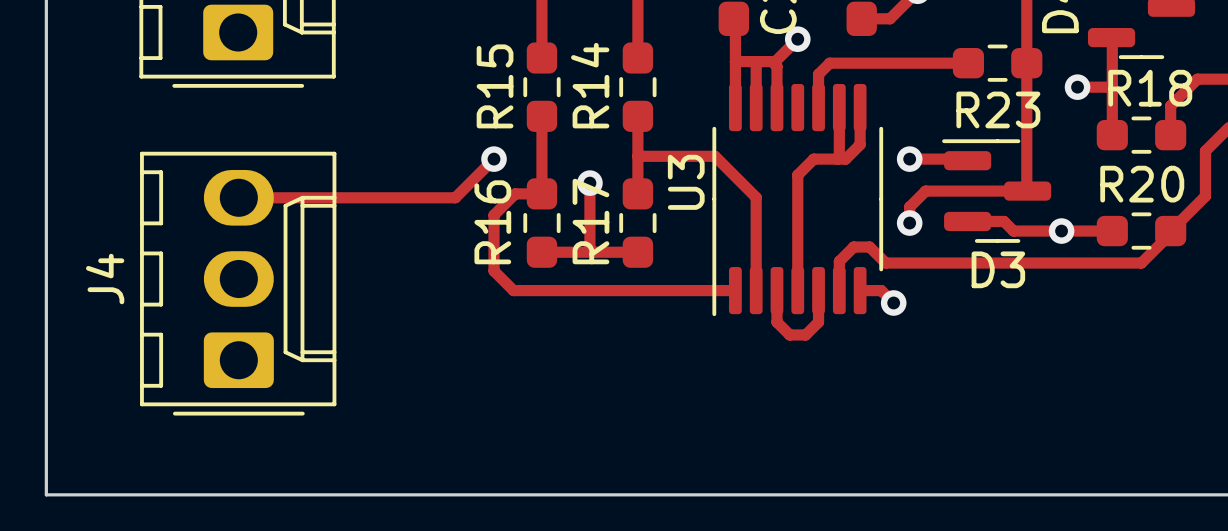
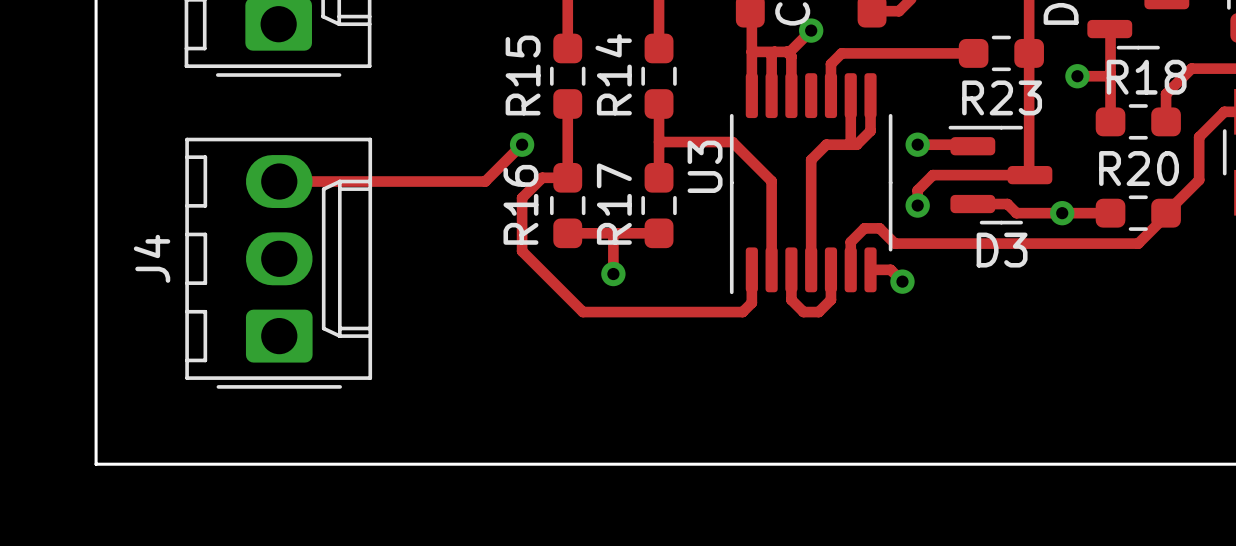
track: (589, 183) (589, 249) (592, 252) -> none
via position: (589, 183) -> (613, 274)
track: none -> (613, 235) (613, 274)
track: (513, 290) (735, 290) -> (540, 269) (582, 312) (742, 312) (751, 302) (751, 269)

